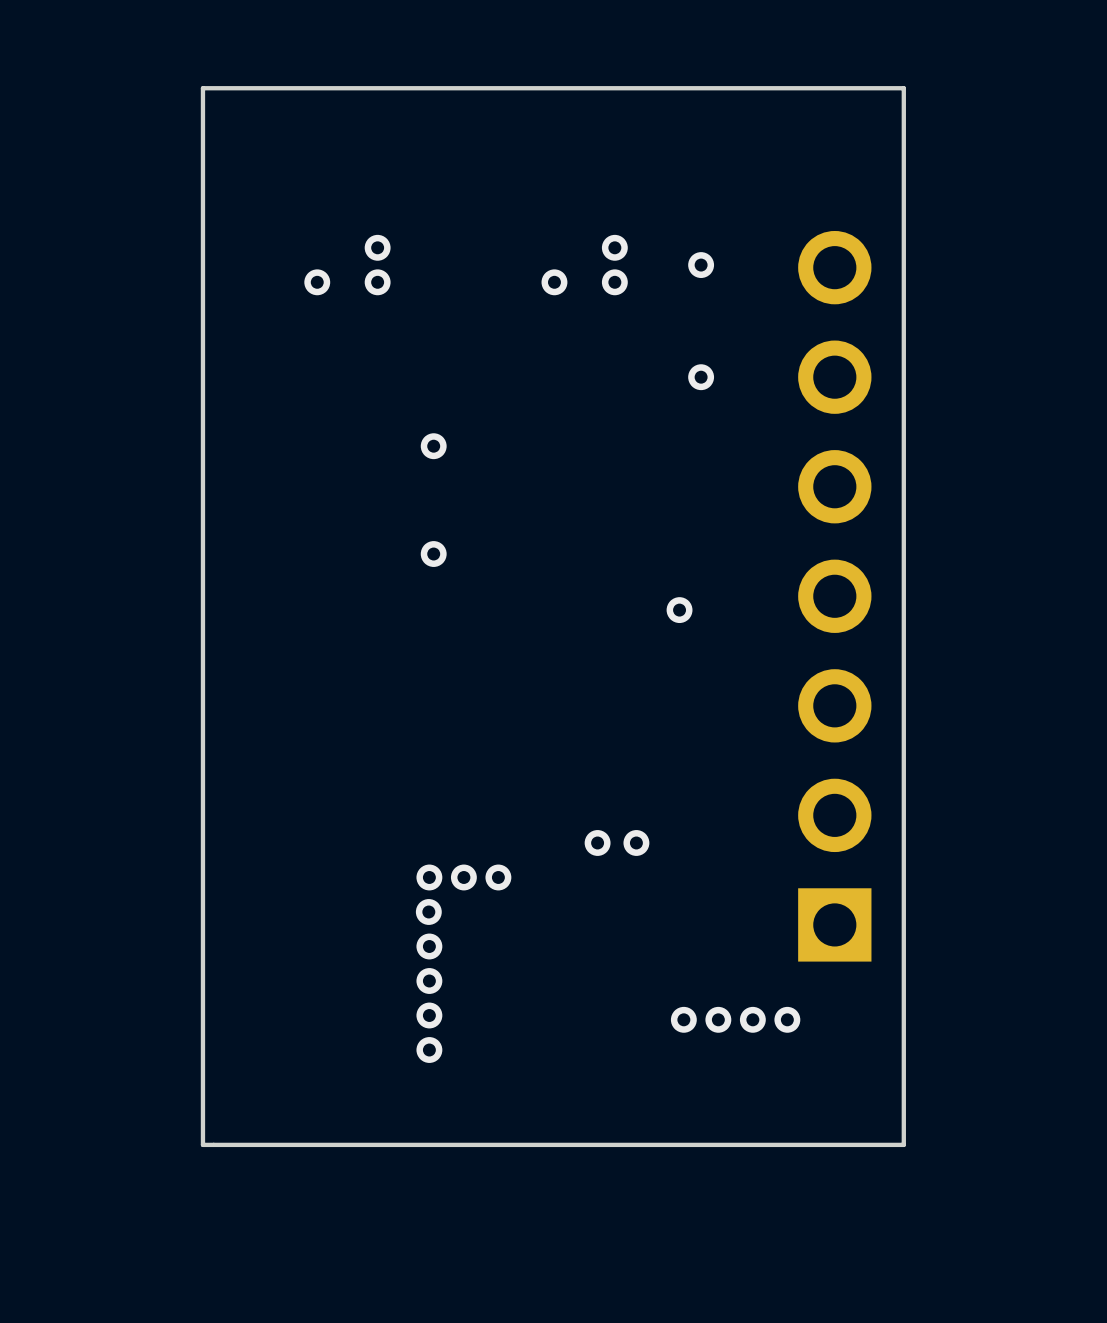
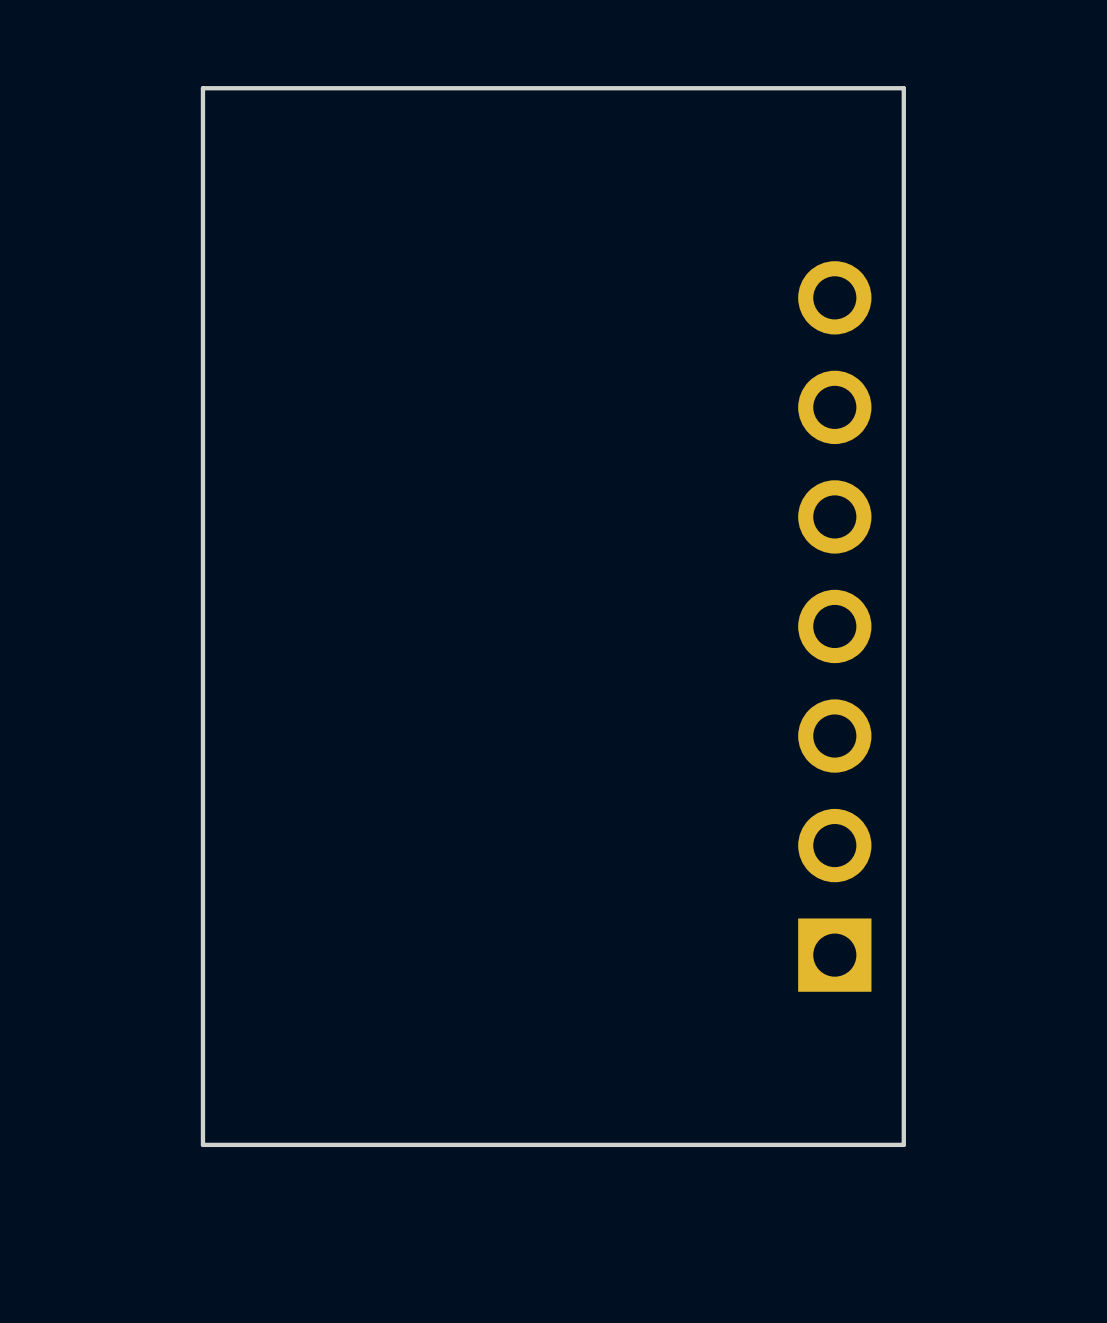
via: (377, 247) -> none
via: (614, 247) -> none
via: (701, 265) -> none
via: (317, 282) -> none
via: (377, 282) -> none
via: (554, 282) -> none
via: (614, 282) -> none
via: (701, 377) -> none
via: (433, 446) -> none
via: (433, 554) -> none
part position: (834, 596) -> (834, 626)
via: (679, 610) -> none
via: (597, 842) -> none
via: (636, 842) -> none
via: (429, 877) -> none
via: (463, 877) -> none
via: (498, 877) -> none
via: (428, 911) -> none
via: (429, 946) -> none
via: (429, 981) -> none
via: (429, 1015) -> none
via: (683, 1019) -> none
via: (718, 1019) -> none
via: (752, 1019) -> none
via: (787, 1019) -> none
via: (429, 1050) -> none

